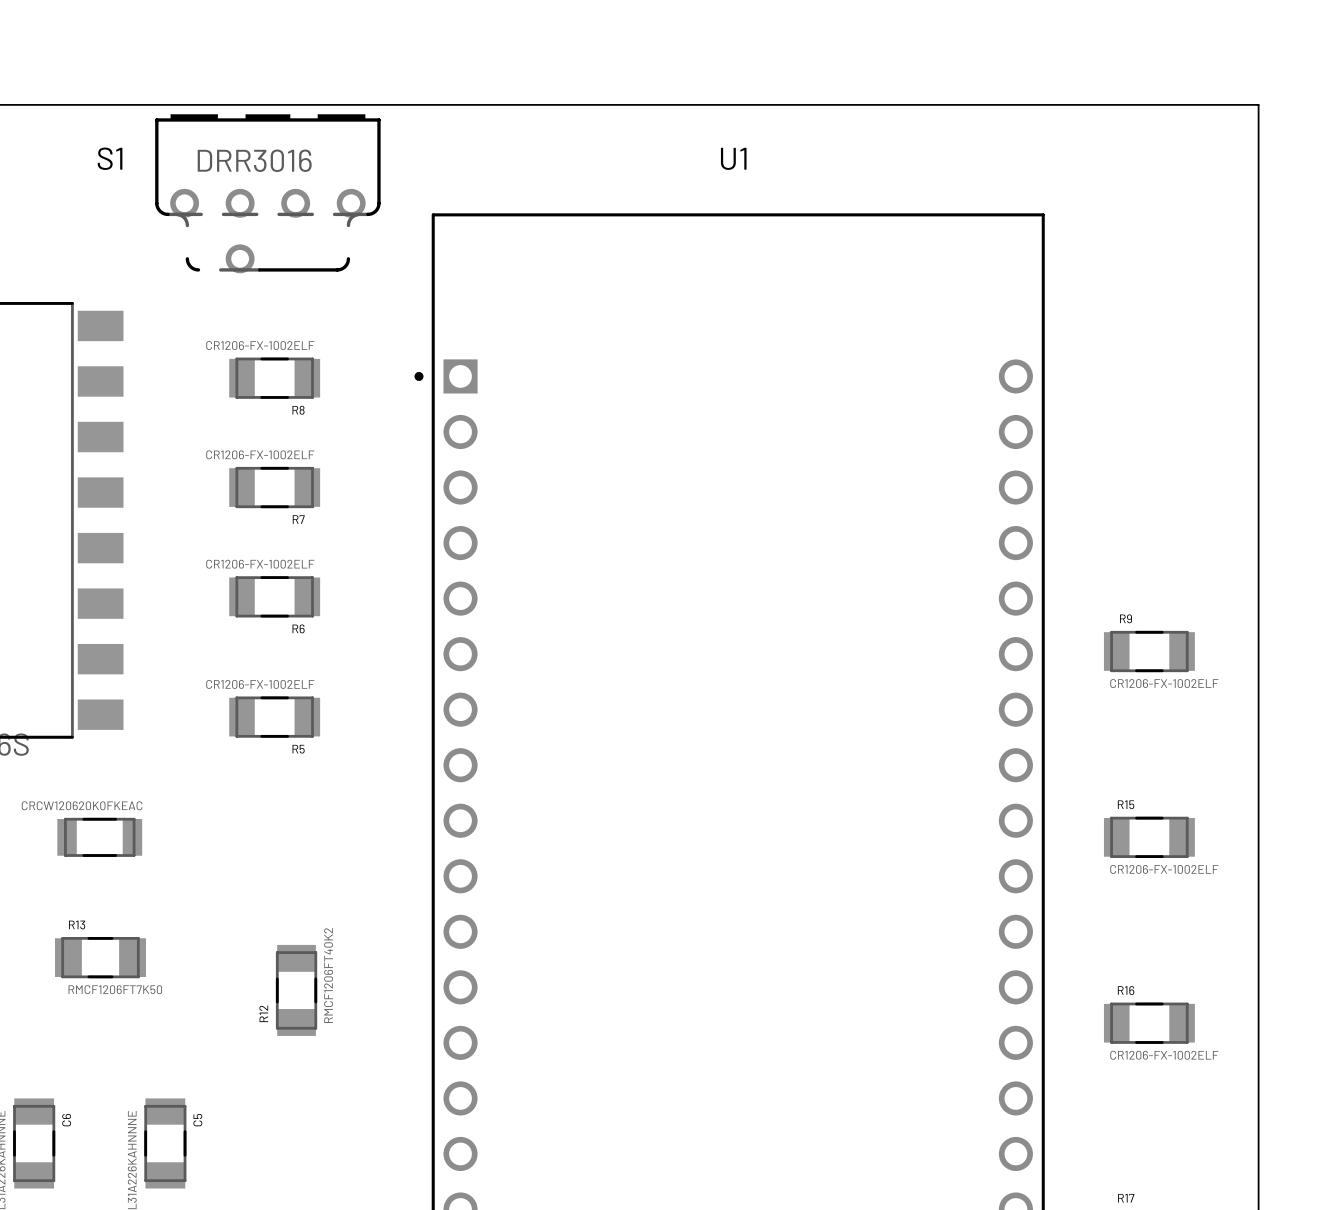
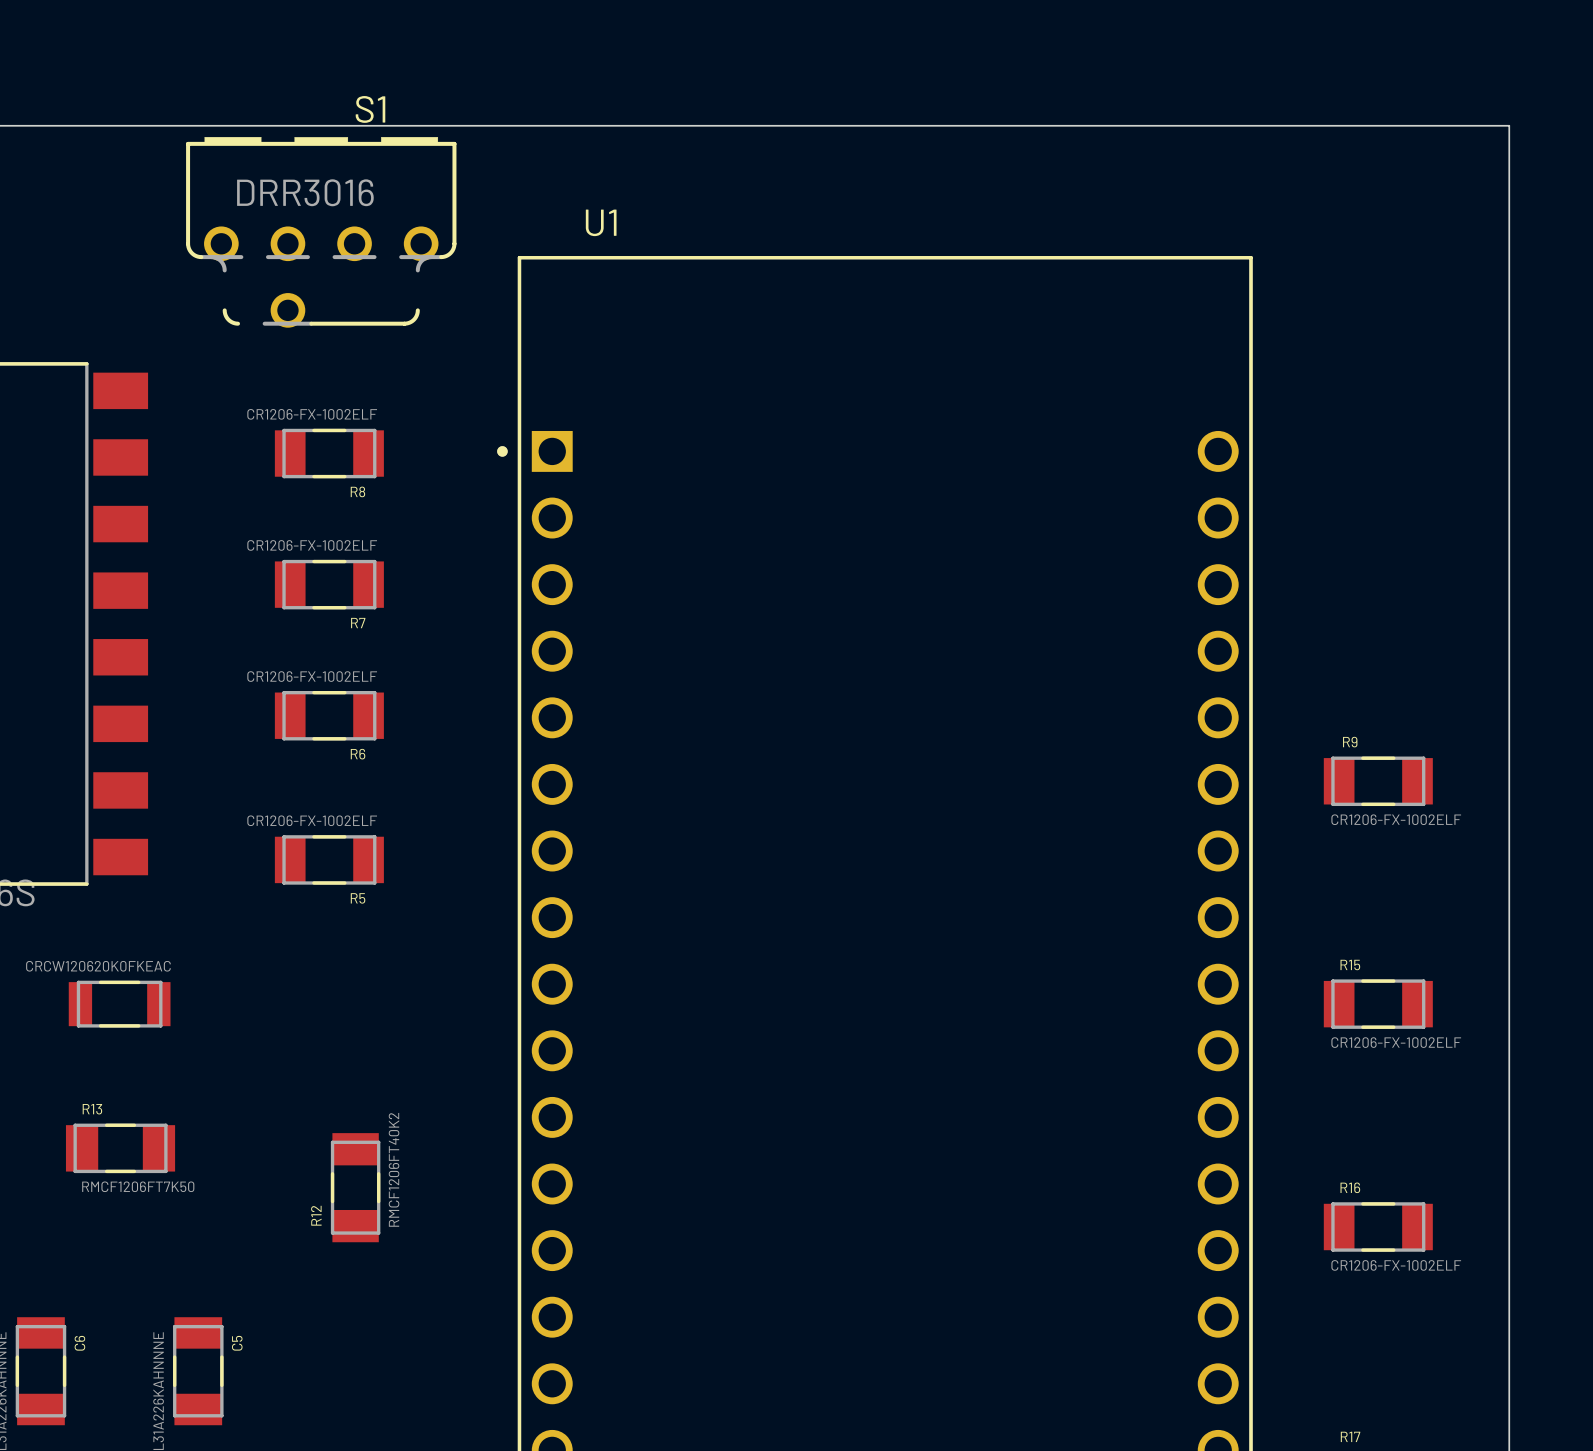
S1 name position: S1 (110, 158) -> S1 (370, 109)
U1 name position: U1 (733, 158) -> U1 (601, 222)

